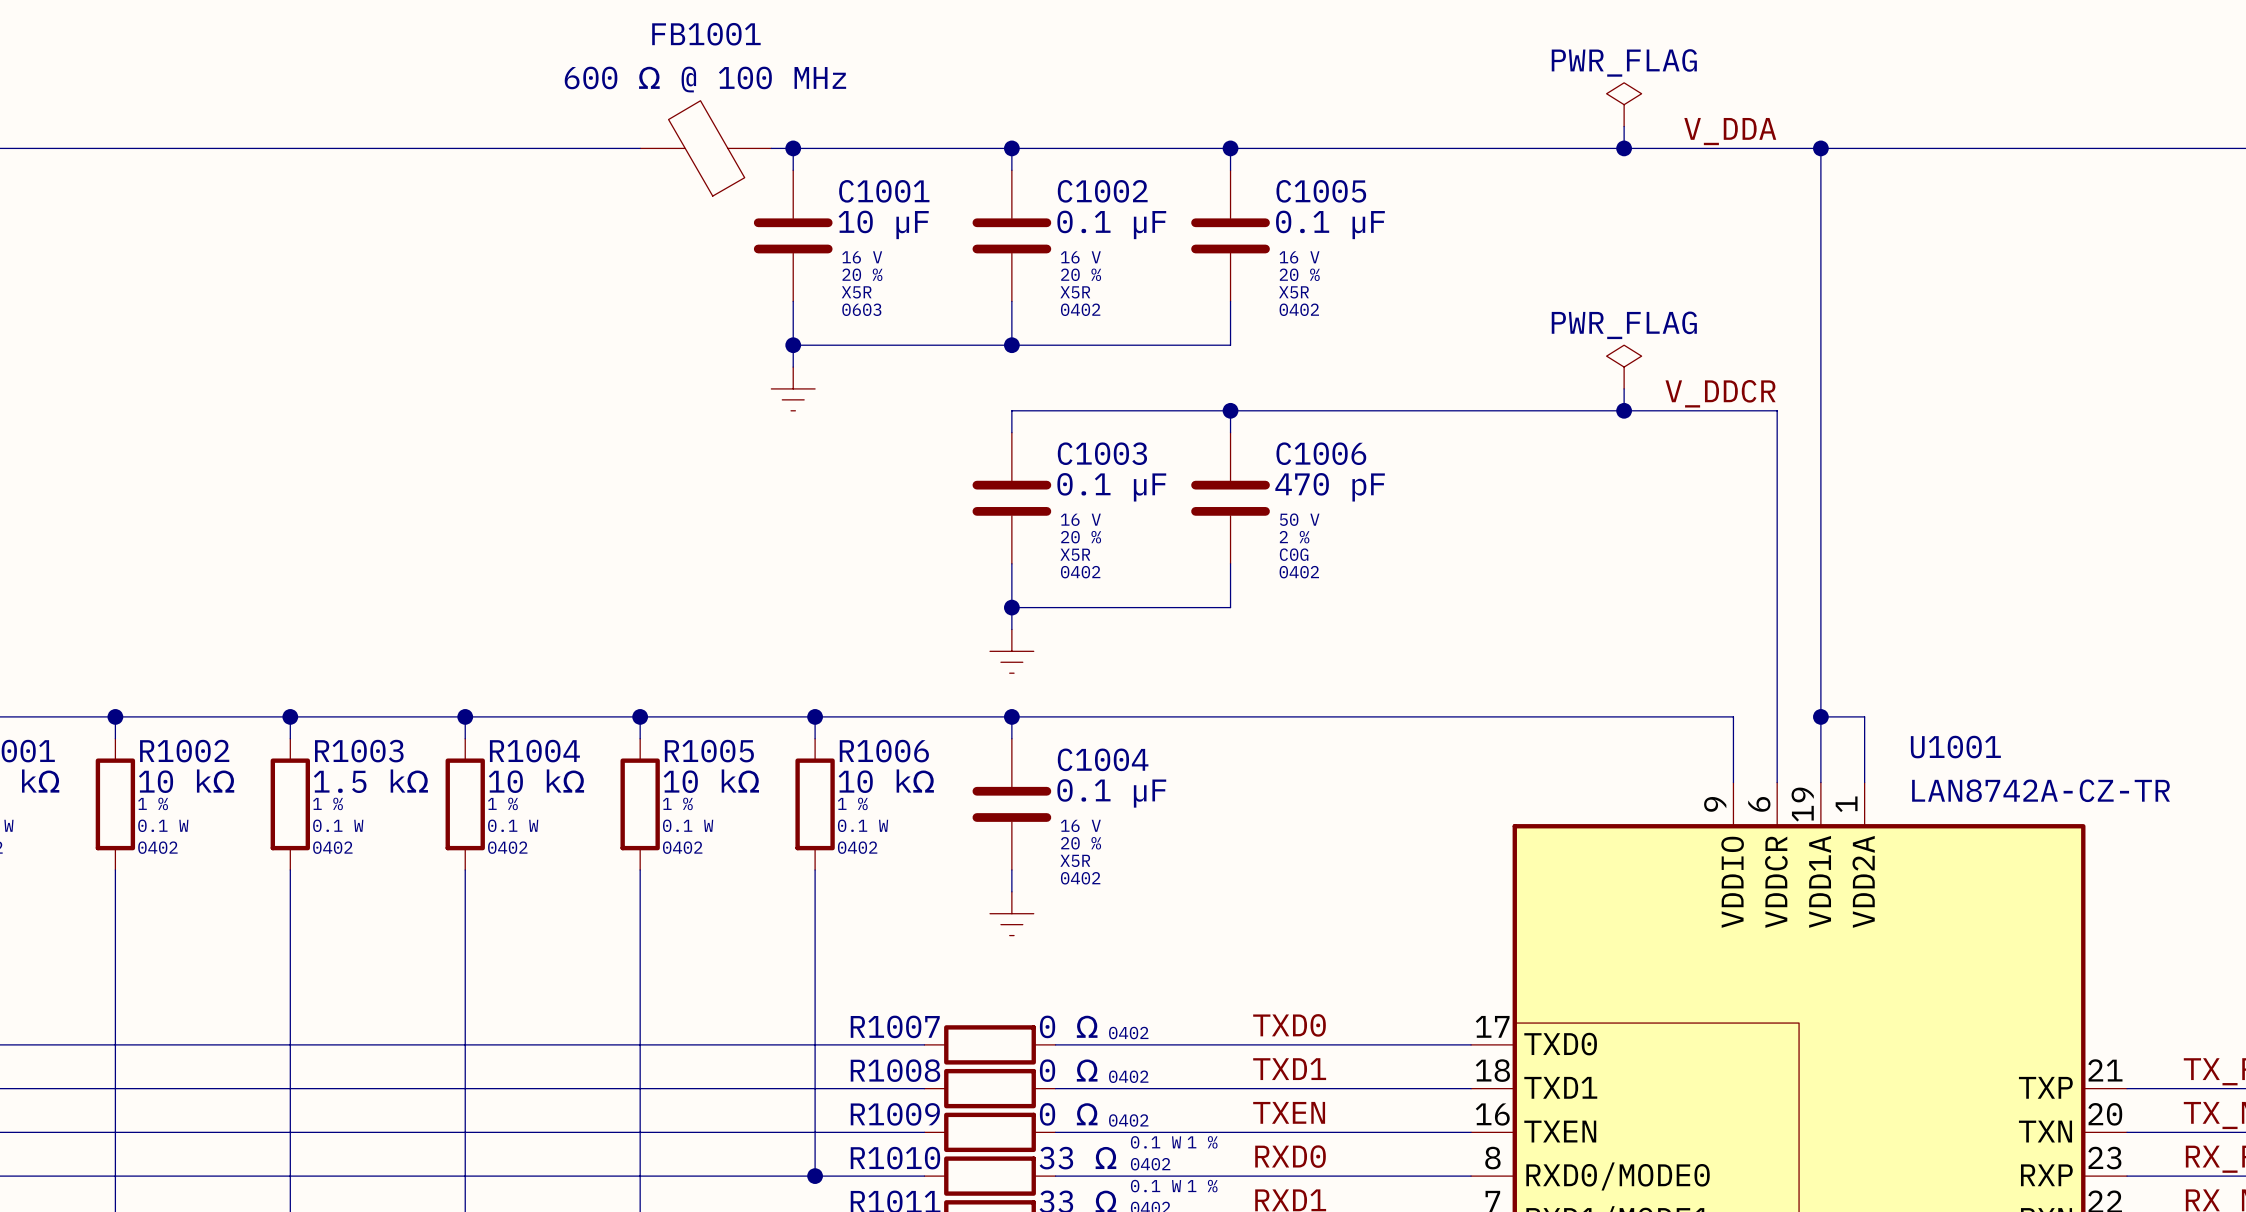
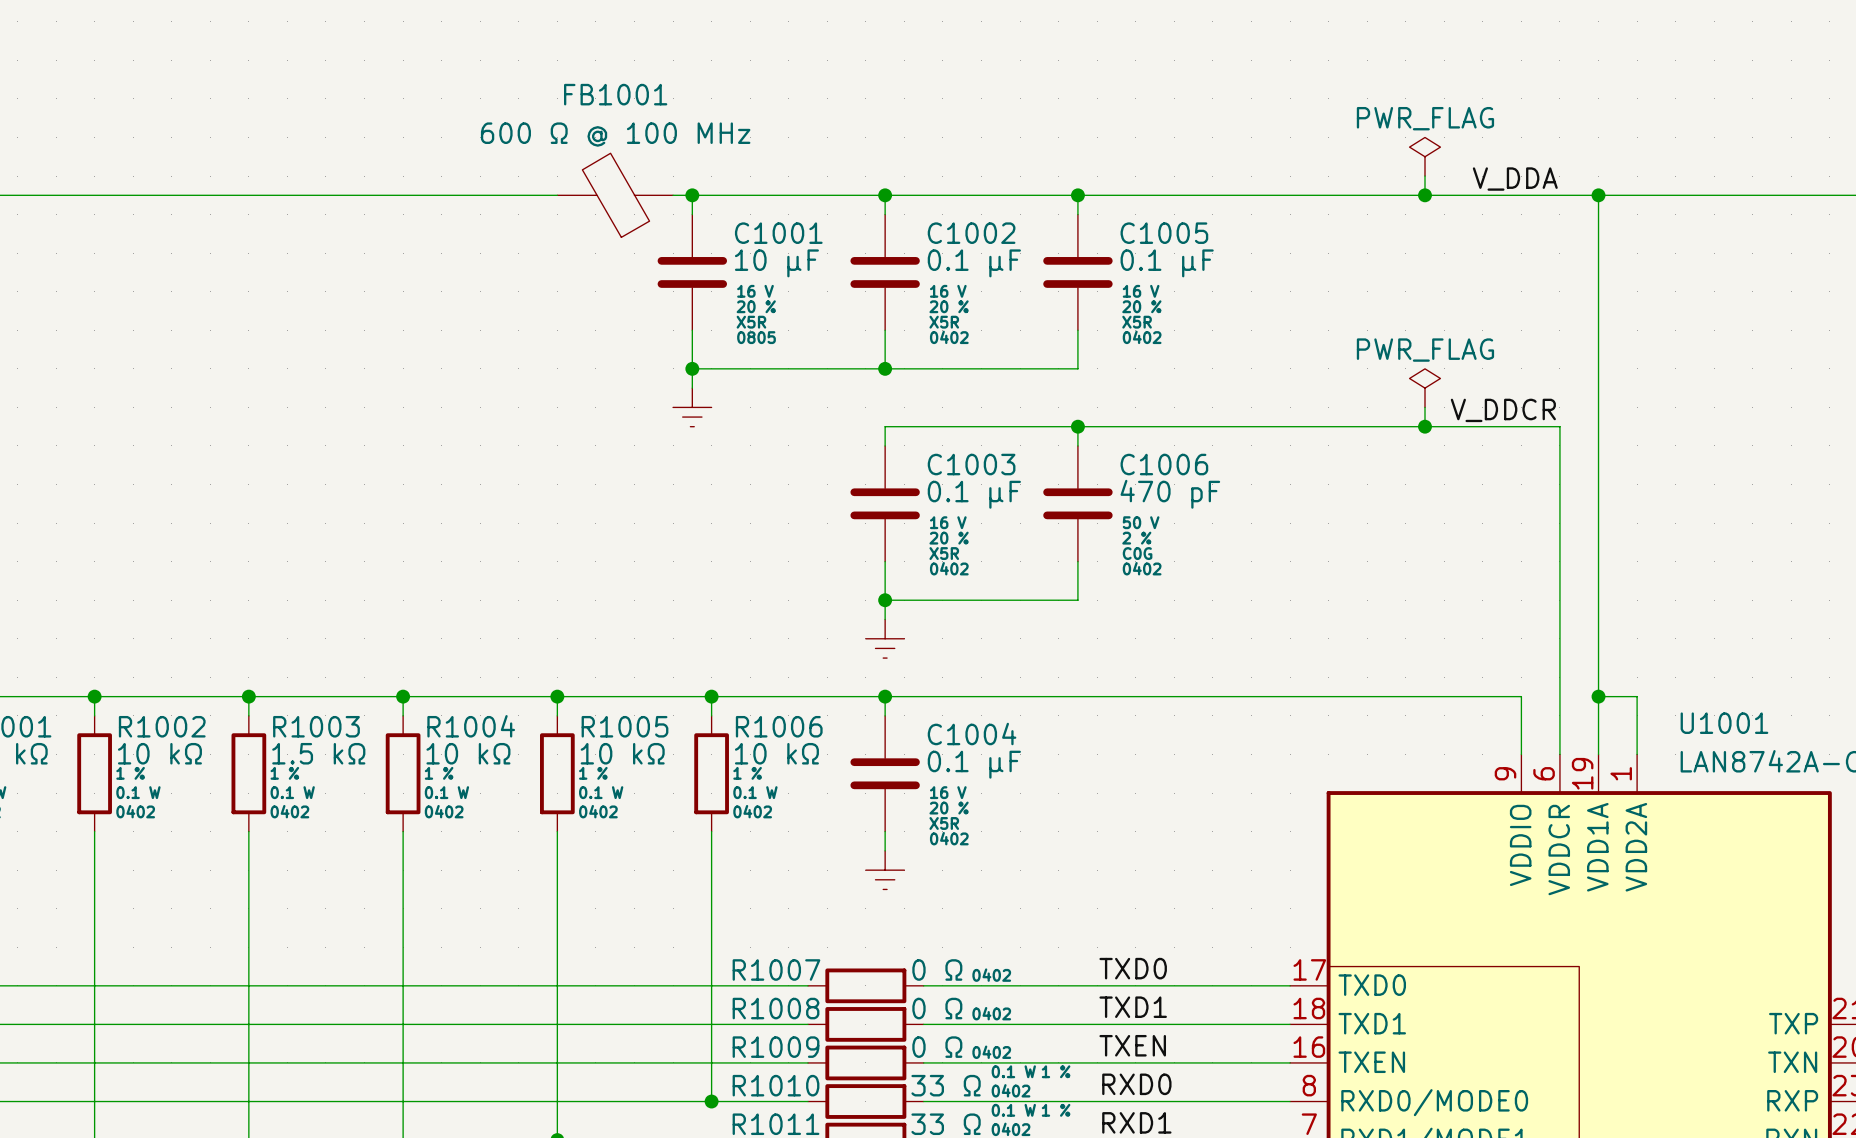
C1001 text: 0603 (861, 309) -> 0805 (756, 337)

